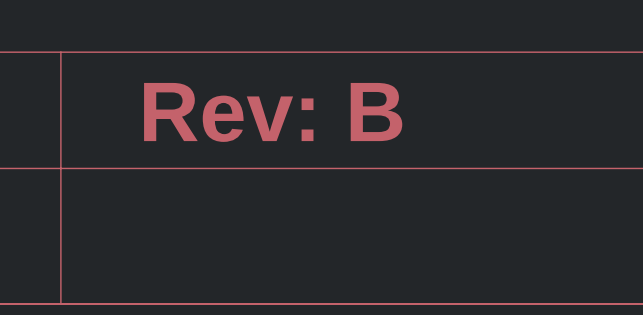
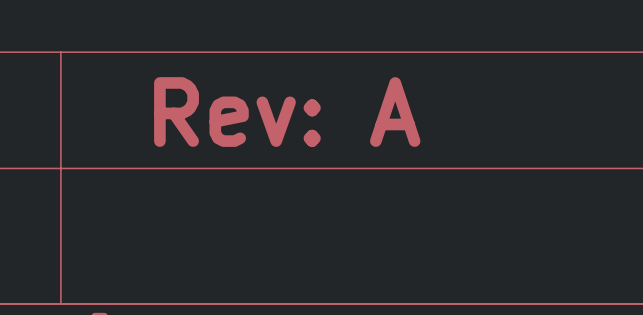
title block: Rev: B (273, 112) -> Rev: A (287, 112)

